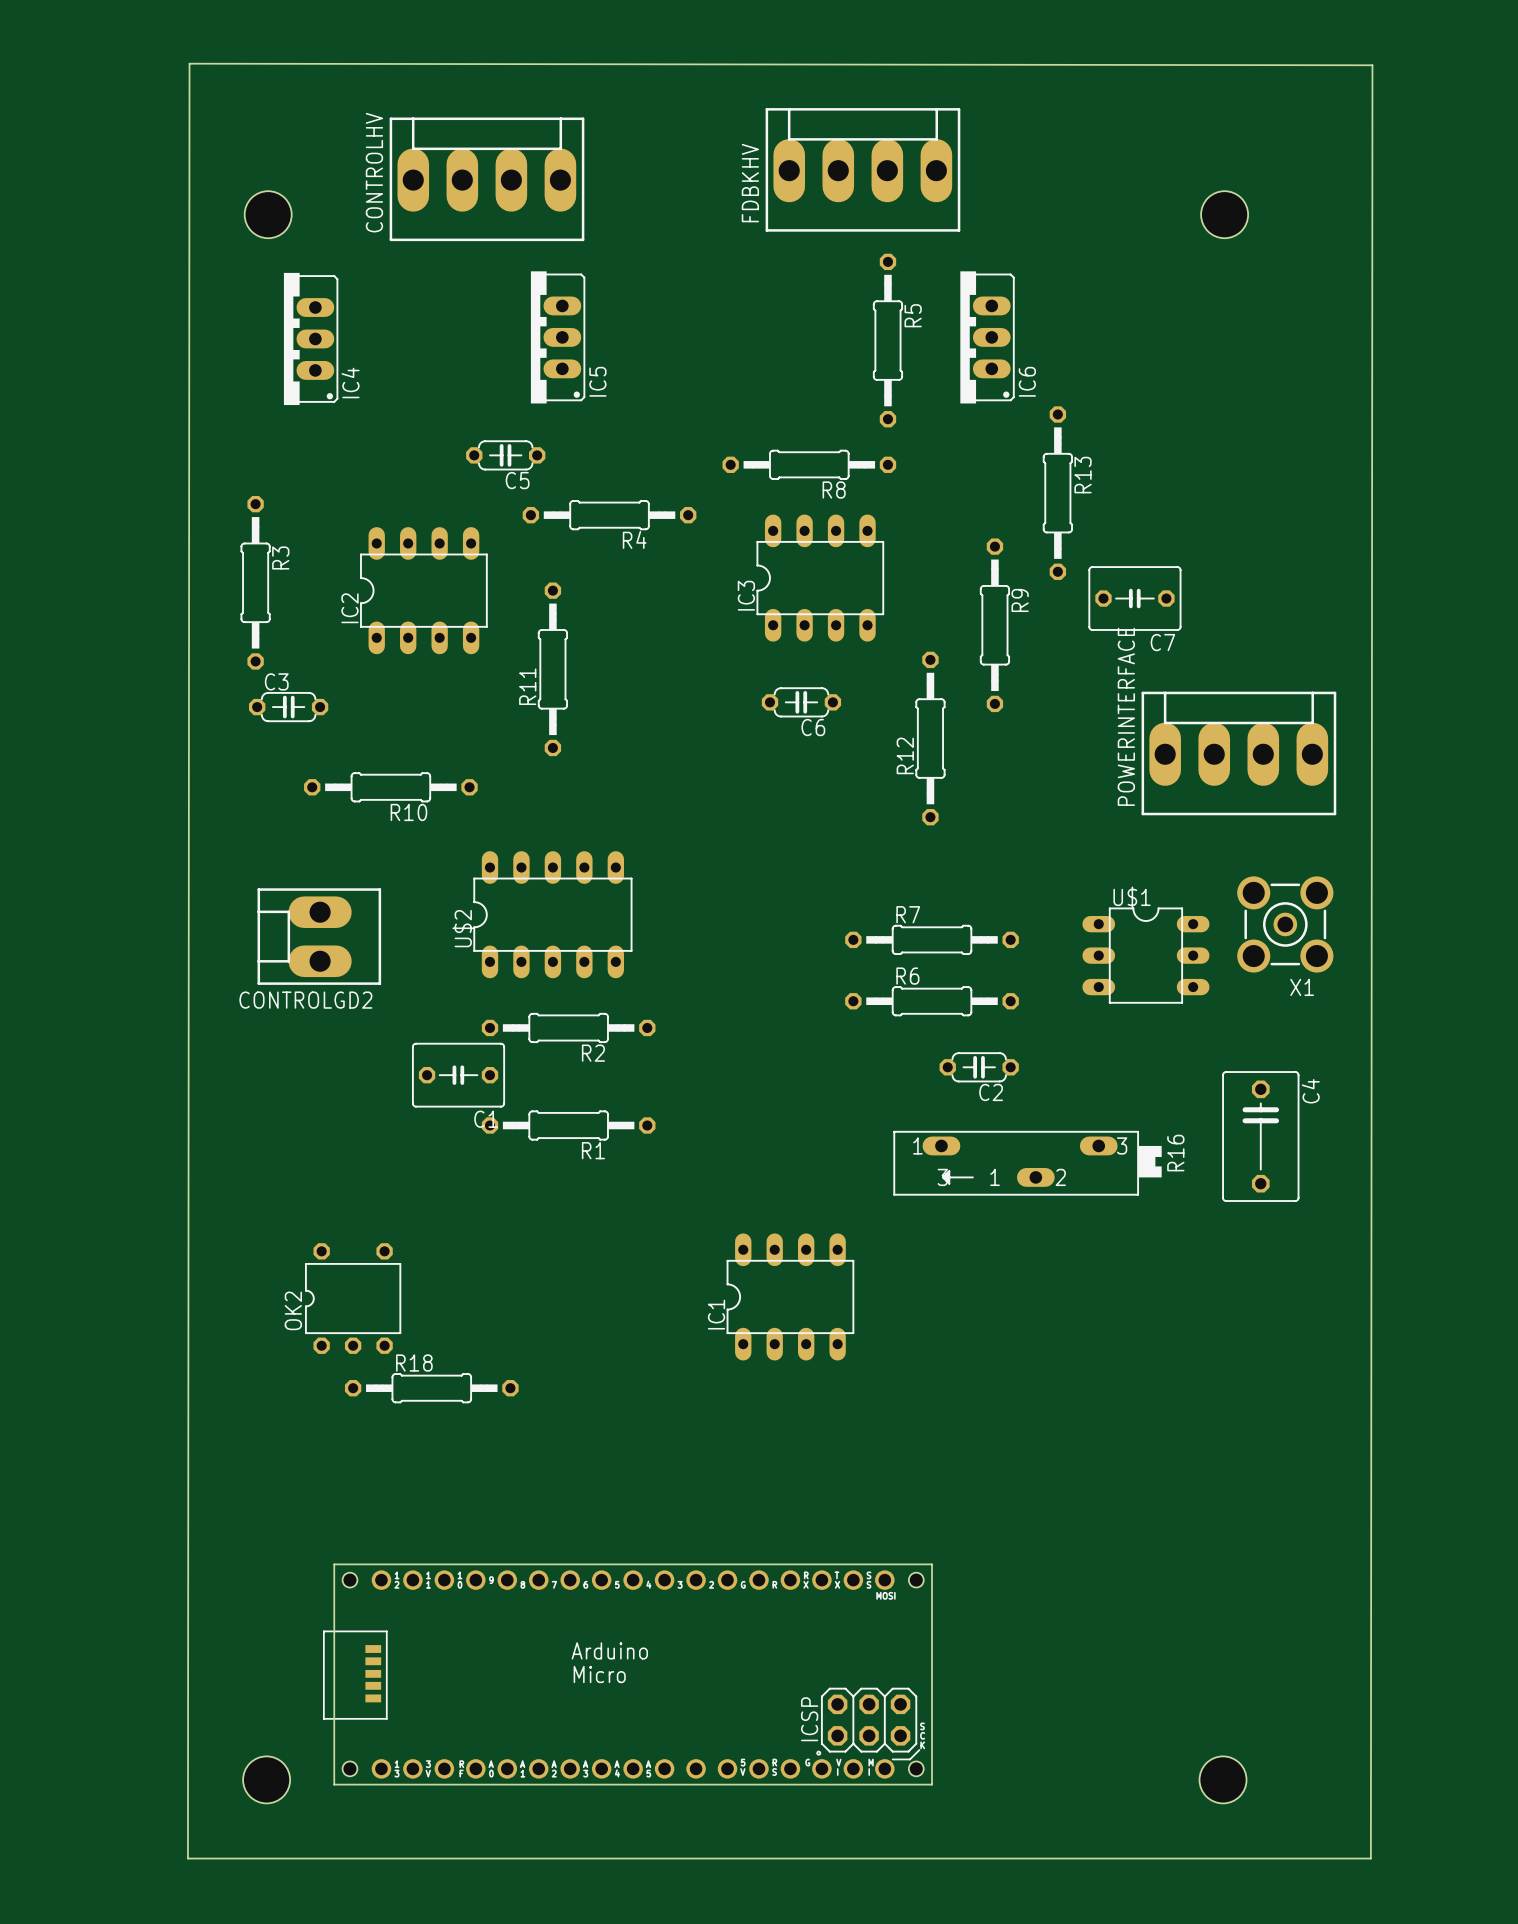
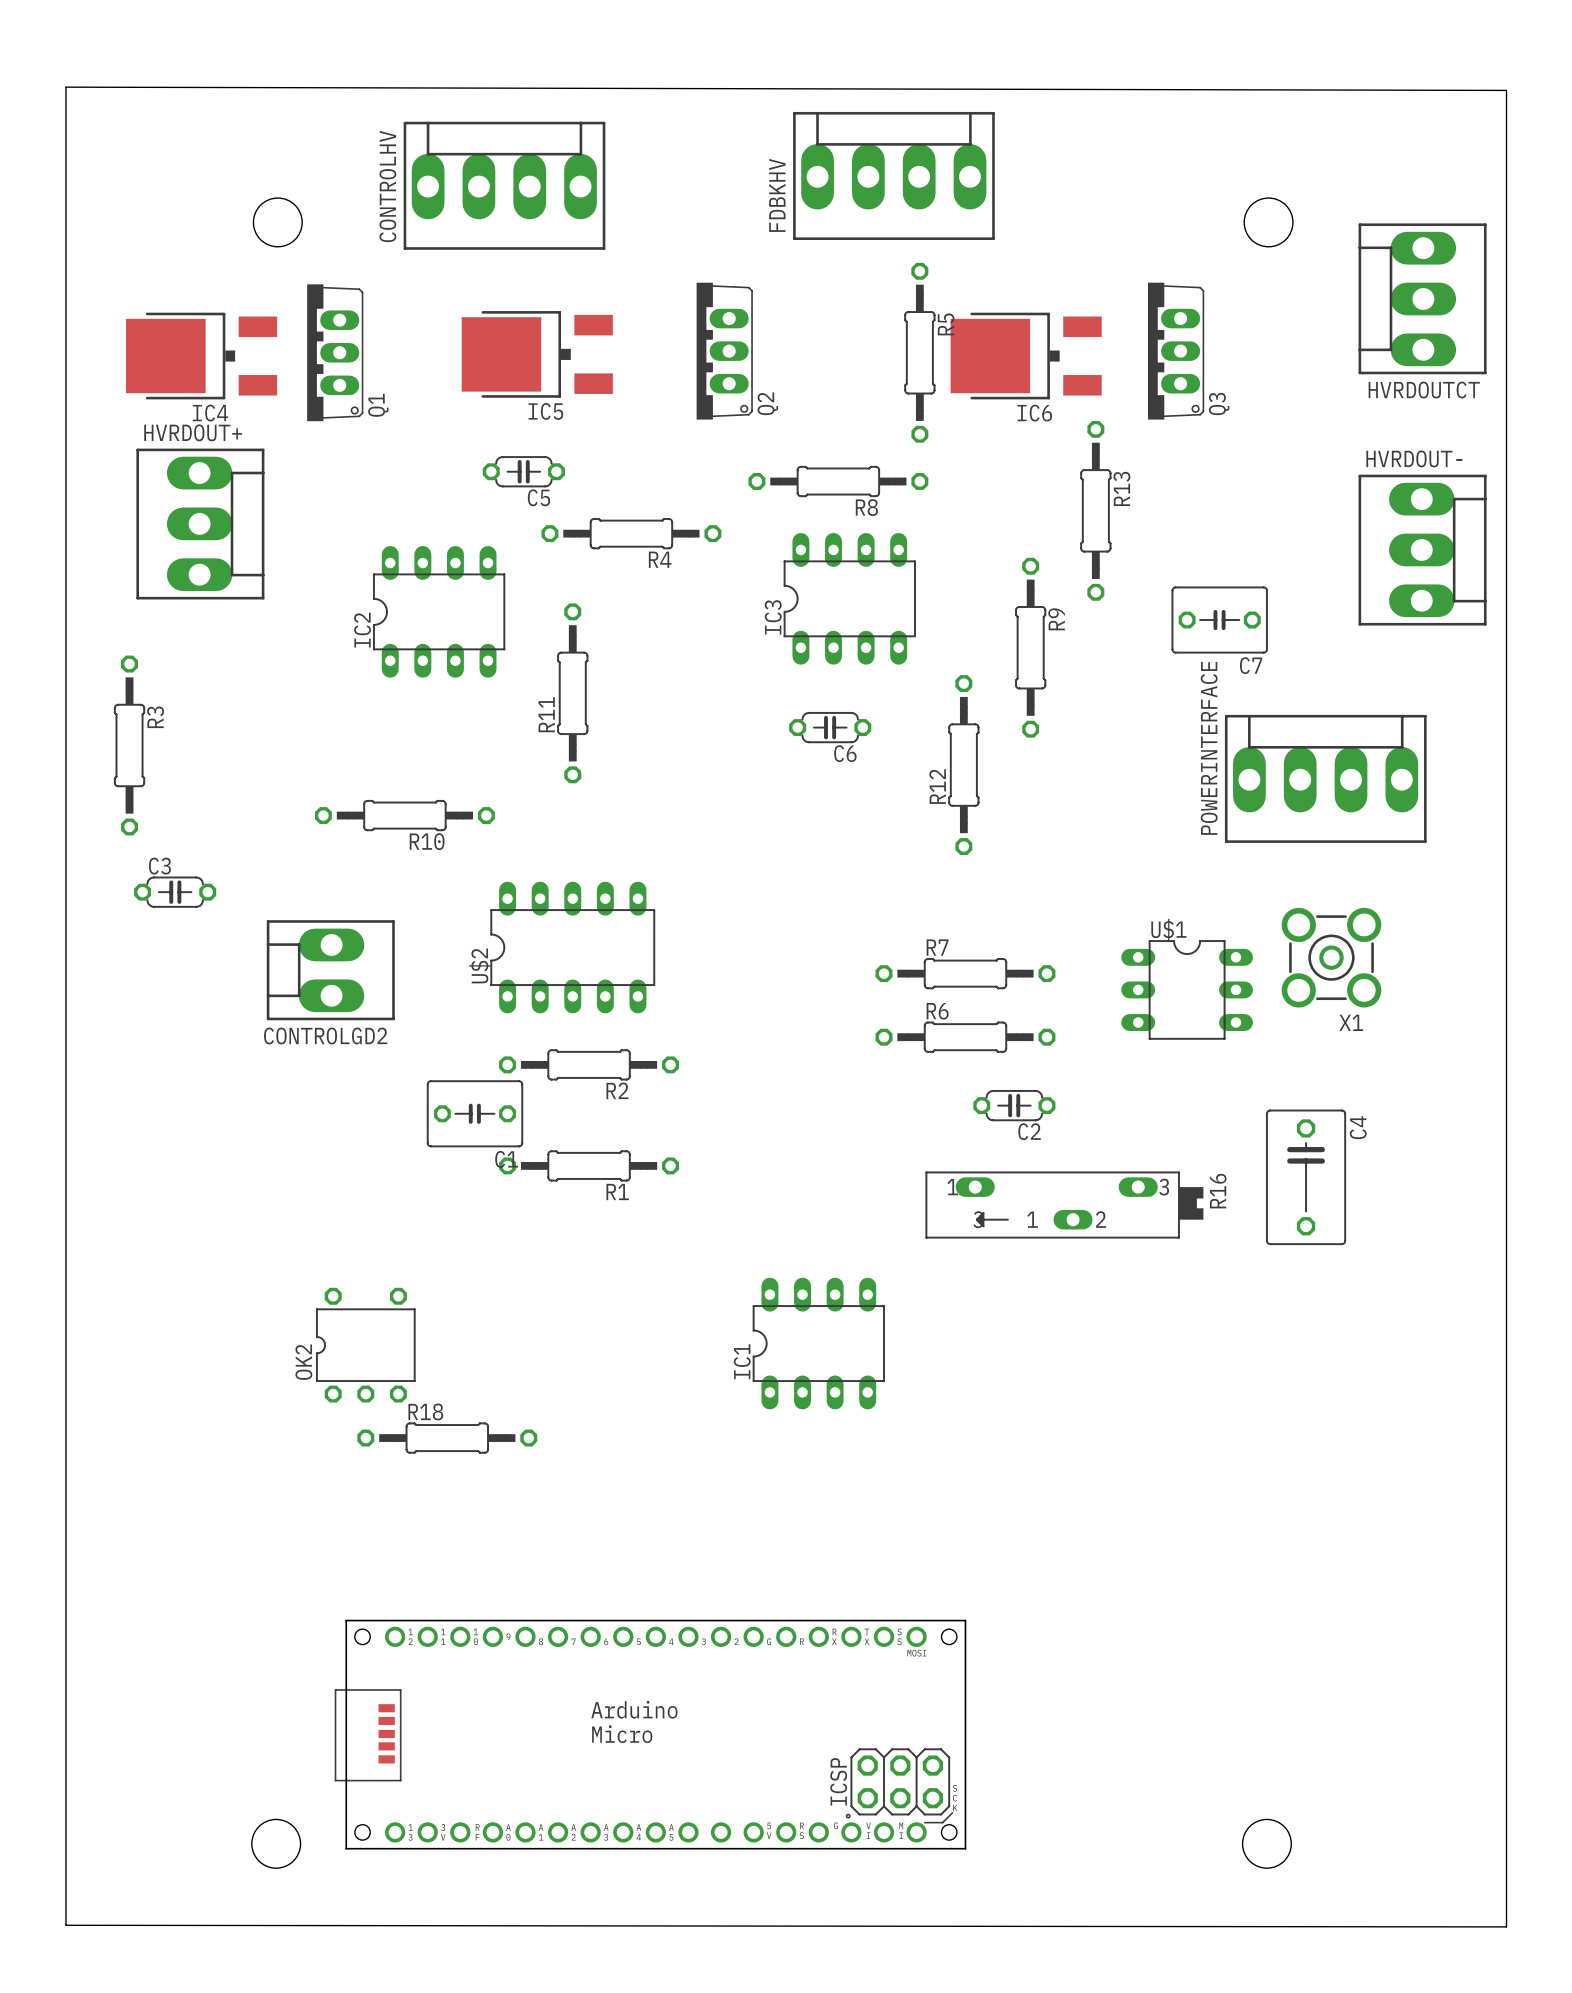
board edge: (189, 63) (1372, 65) (1370, 1858) (187, 1858) (189, 63) -> (65, 87) (65, 1925) (1506, 1926) (1506, 90) (65, 87)
IC5 footprint: [530, 271, 586, 404] -> [461, 311, 613, 398]
IC6 footprint: [960, 271, 1015, 404] -> [950, 312, 1102, 400]
IC4 footprint: [283, 272, 339, 406] -> [126, 312, 278, 400]
HVRDOUTCT: none -> (1422, 298)
Q2: none -> (724, 351)
Q3: none -> (1176, 351)
Q1: none -> (335, 352)
IC5 name position: IC5 (597, 381) -> IC5 (545, 411)
IC6 name position: IC6 (1027, 381) -> IC6 (1034, 413)
IC4 name position: IC4 (350, 382) -> IC4 (210, 413)
HVRDOUT+: none -> (200, 524)
HVRDOUT-: none -> (1422, 550)
R3 position: (255, 582) -> (129, 745)
C7 position: (1134, 598) -> (1219, 620)
C3 position: (288, 707) -> (175, 892)
POWERINTERFACE position: (1238, 753) -> (1325, 778)

